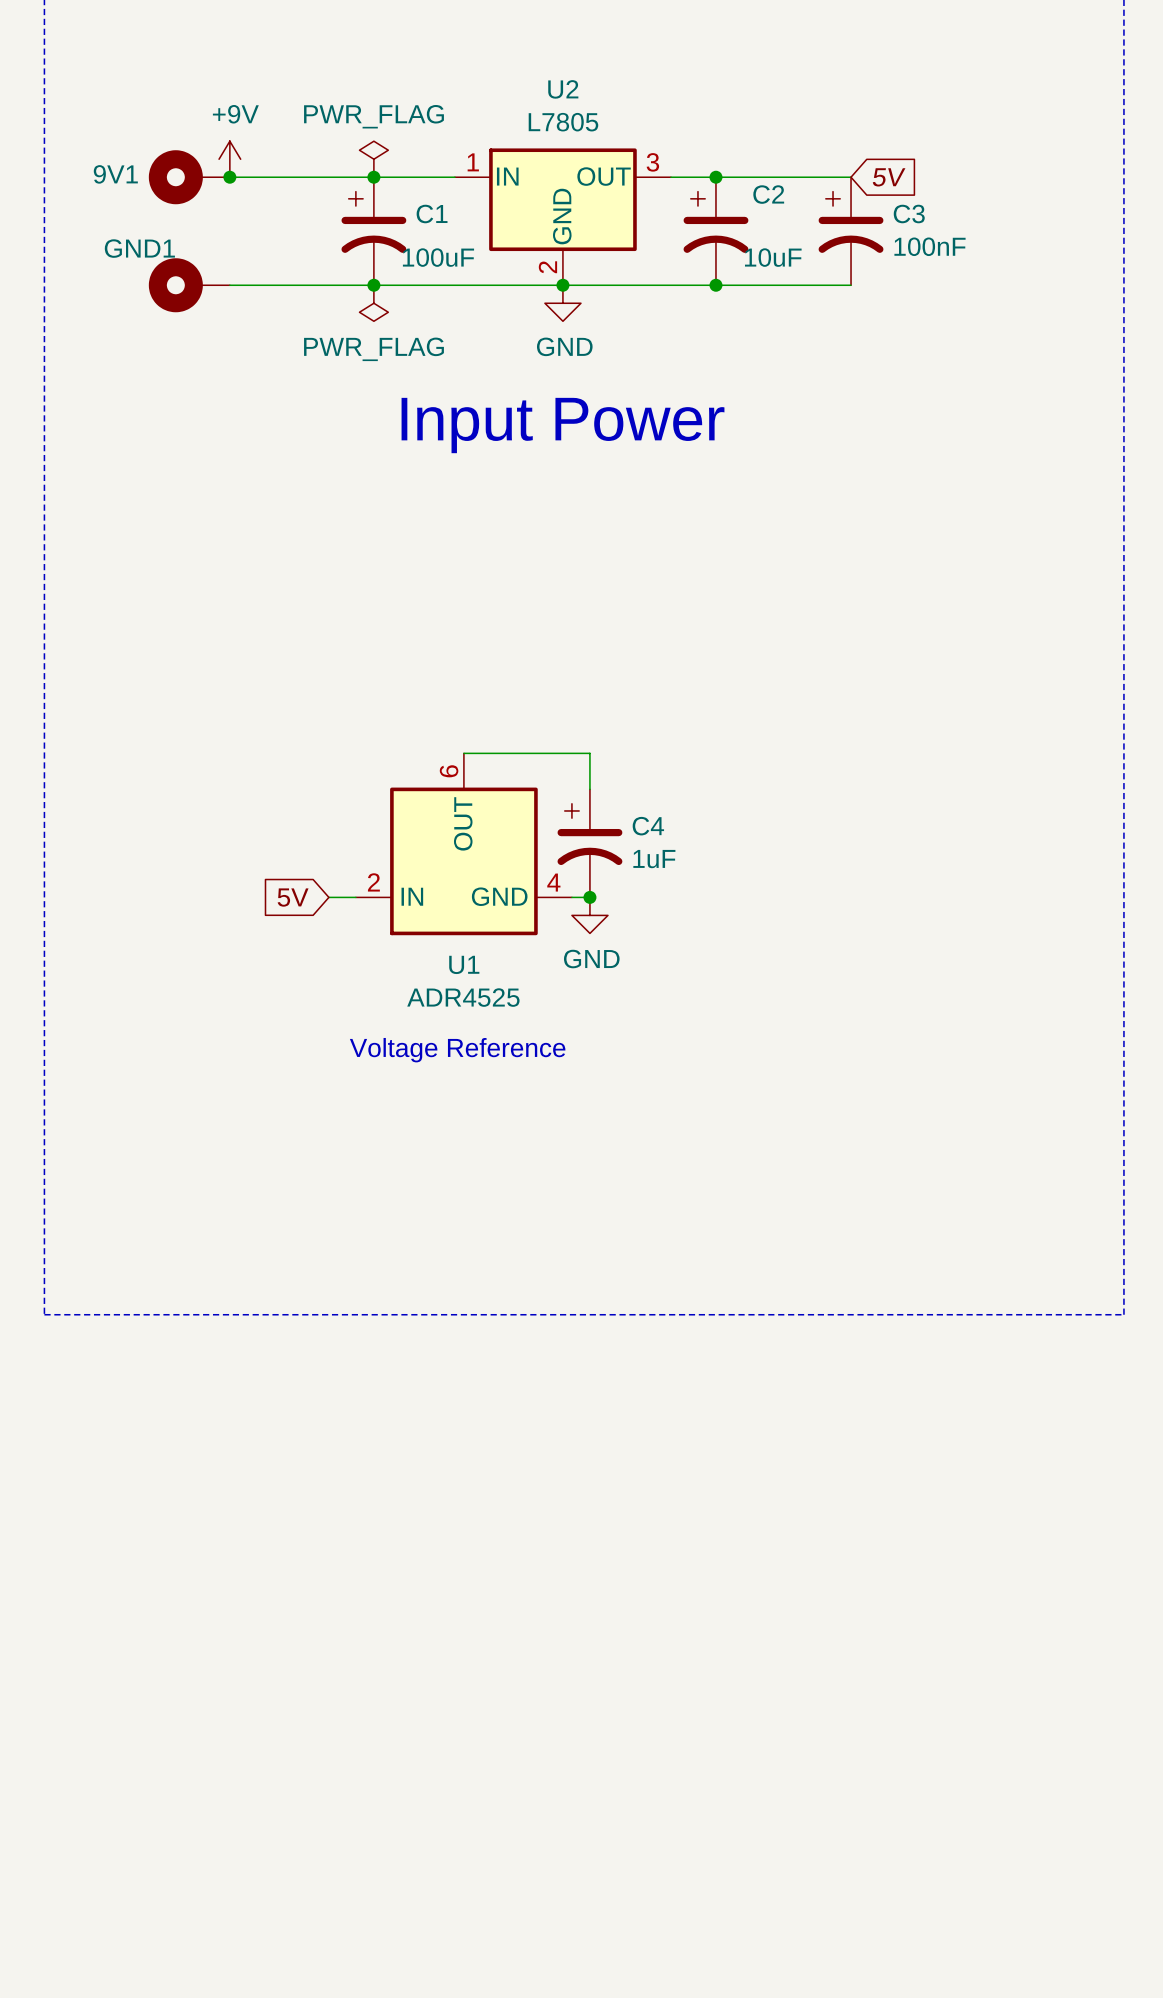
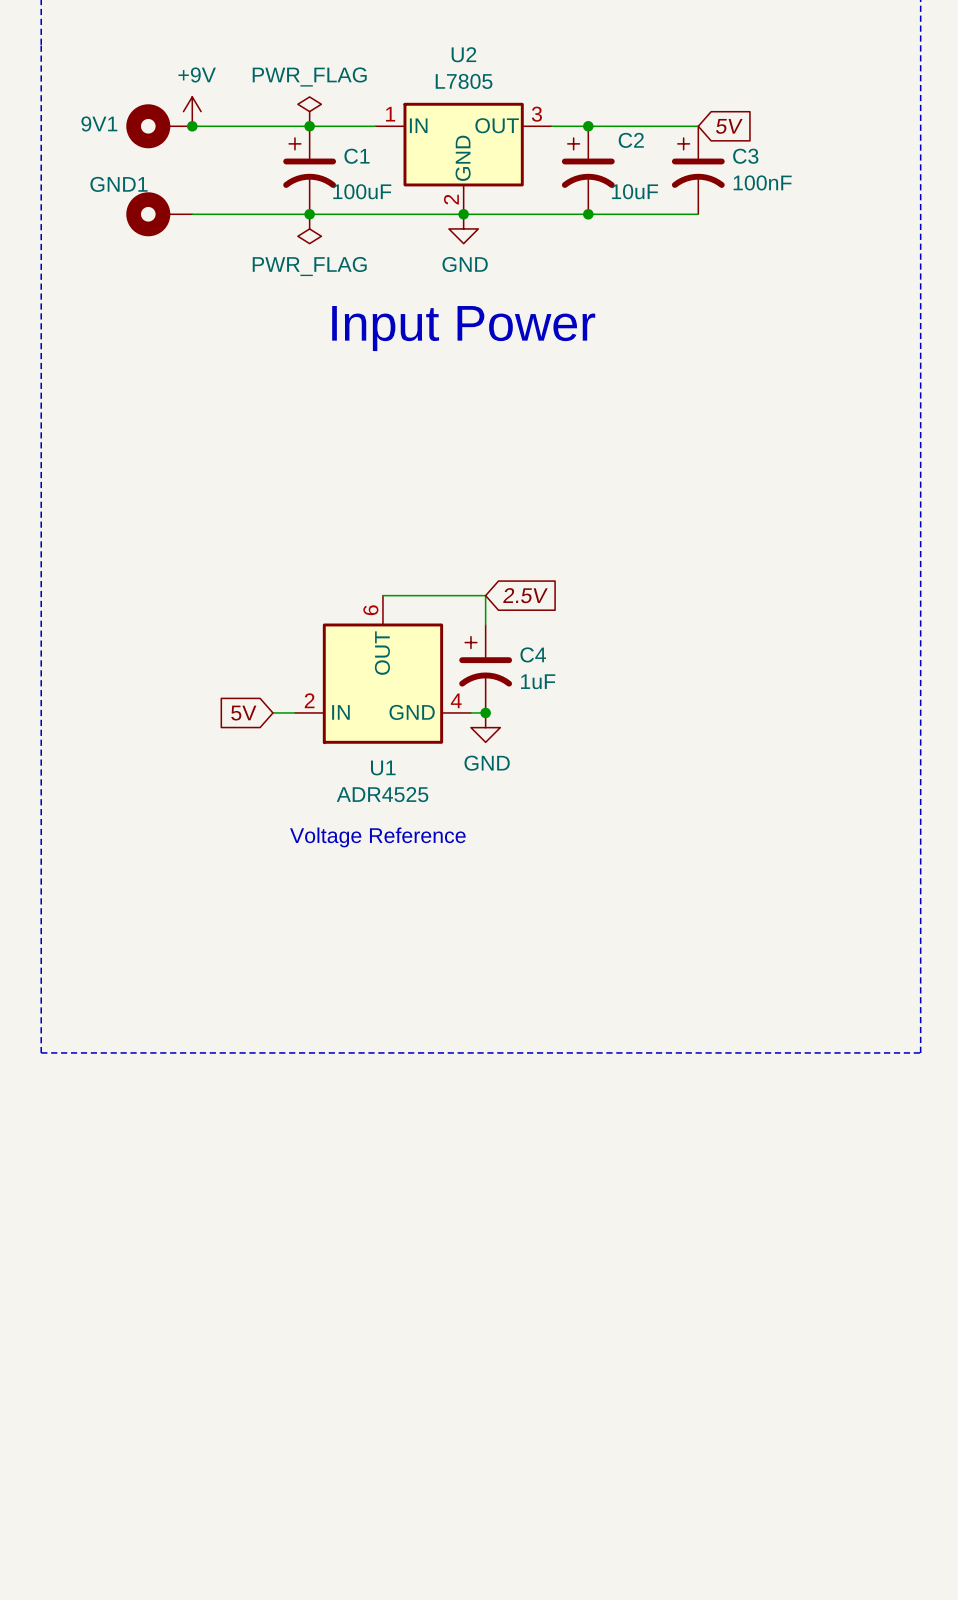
global label: none -> 2.5V (525, 595)

